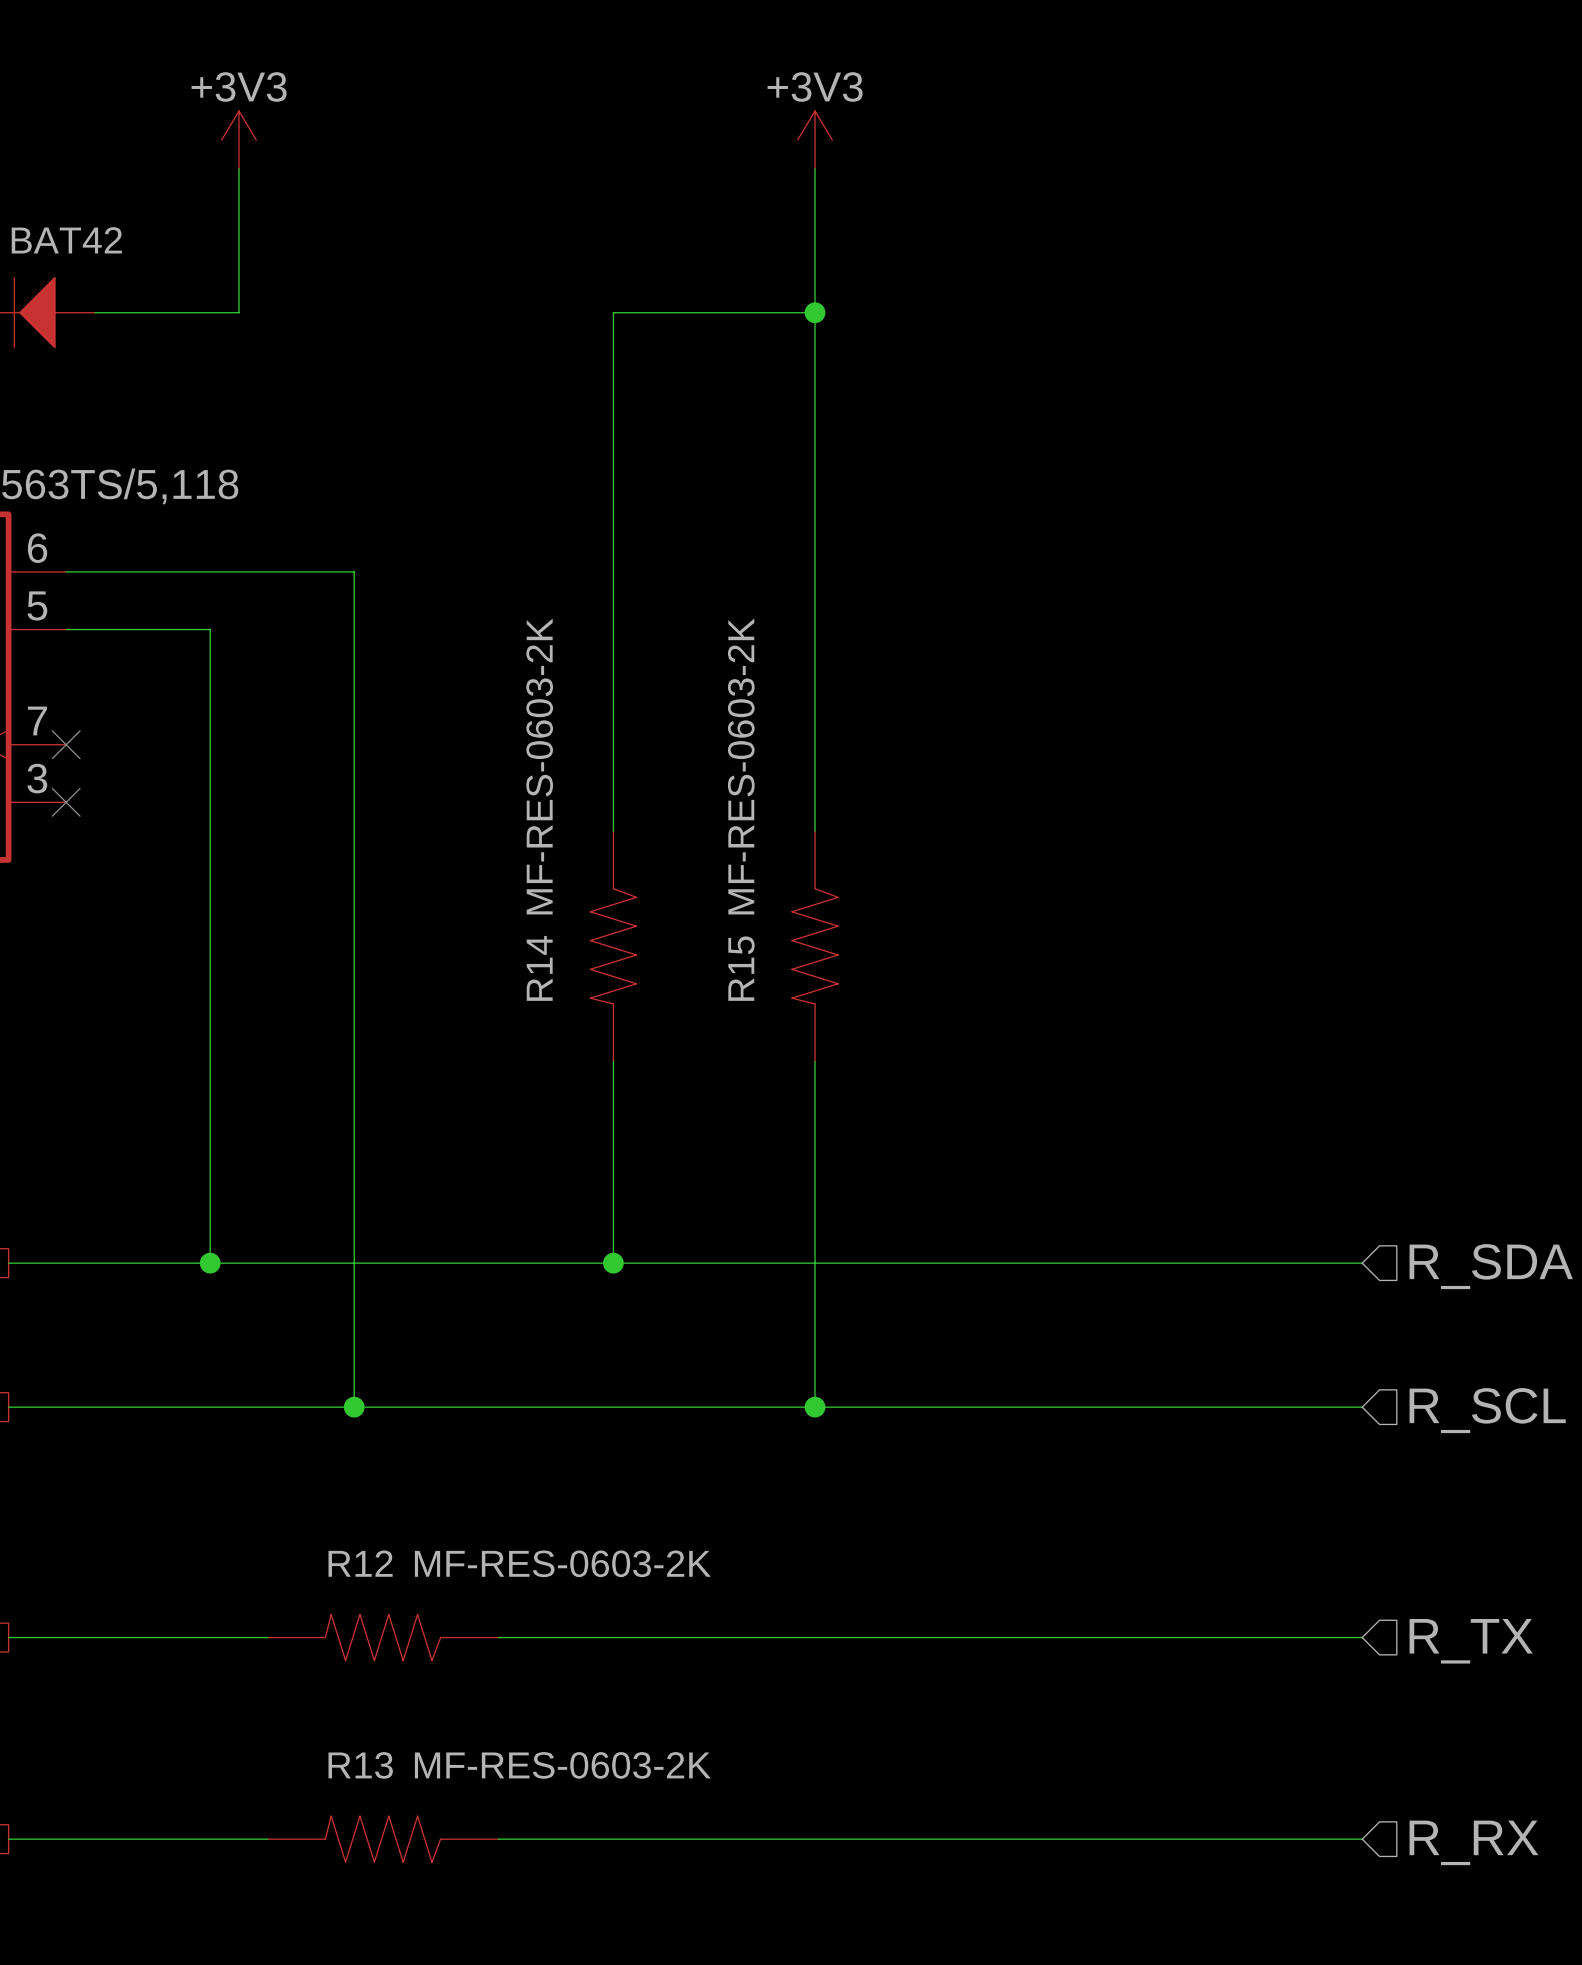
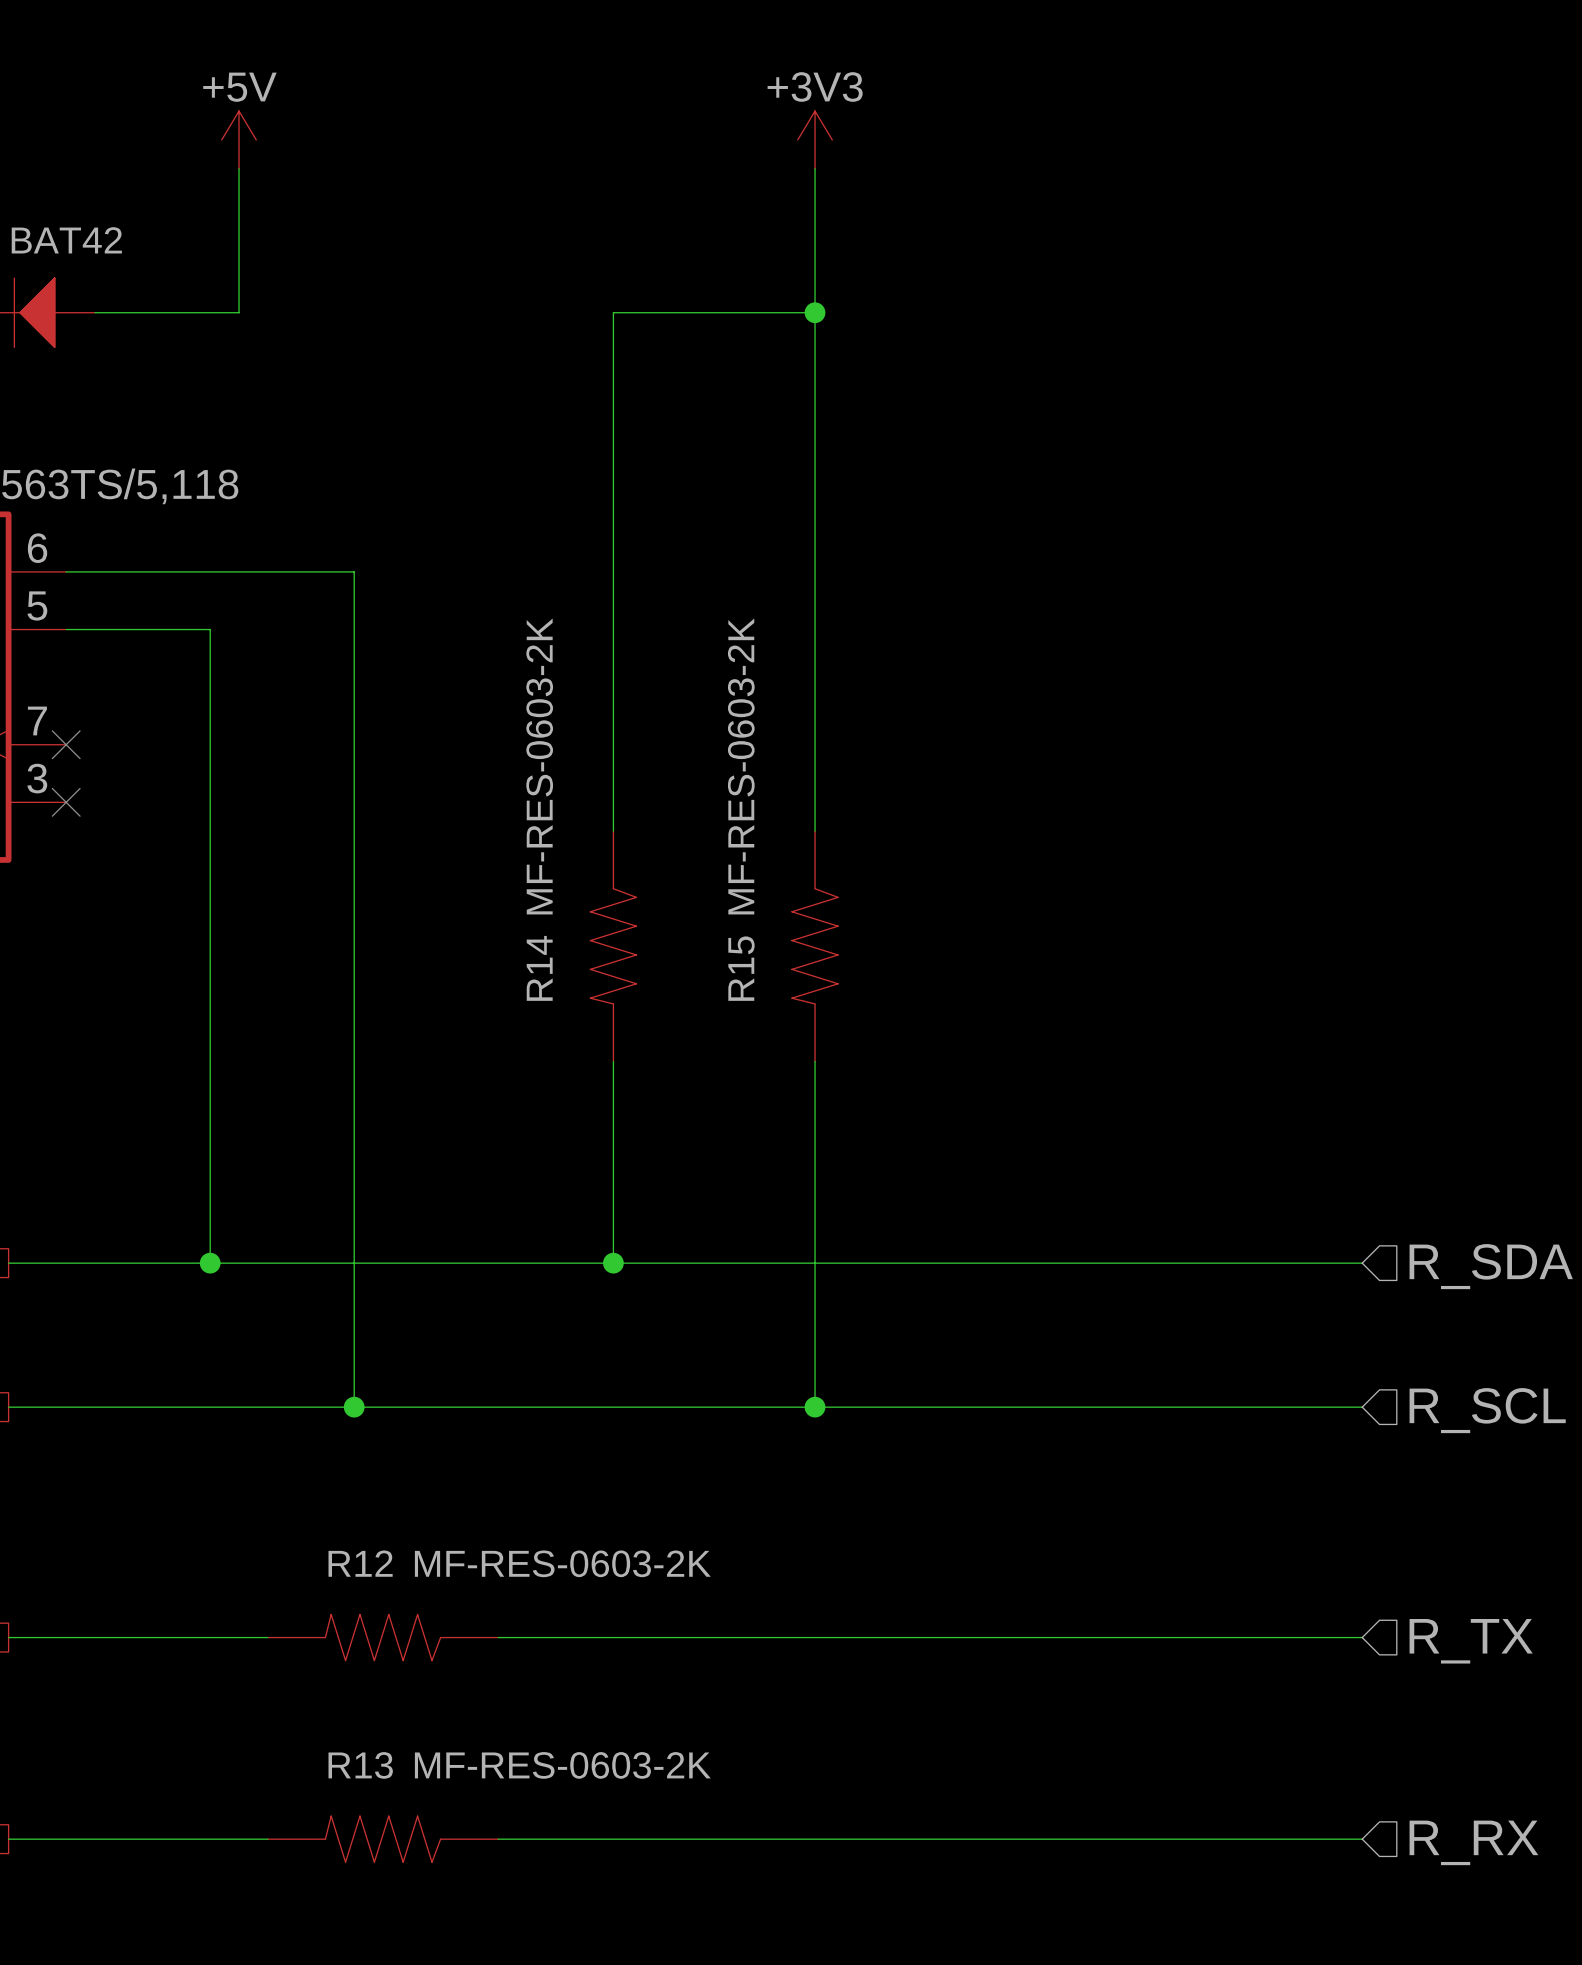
power symbol: +3V3 (239, 139) -> +5V (239, 139)

